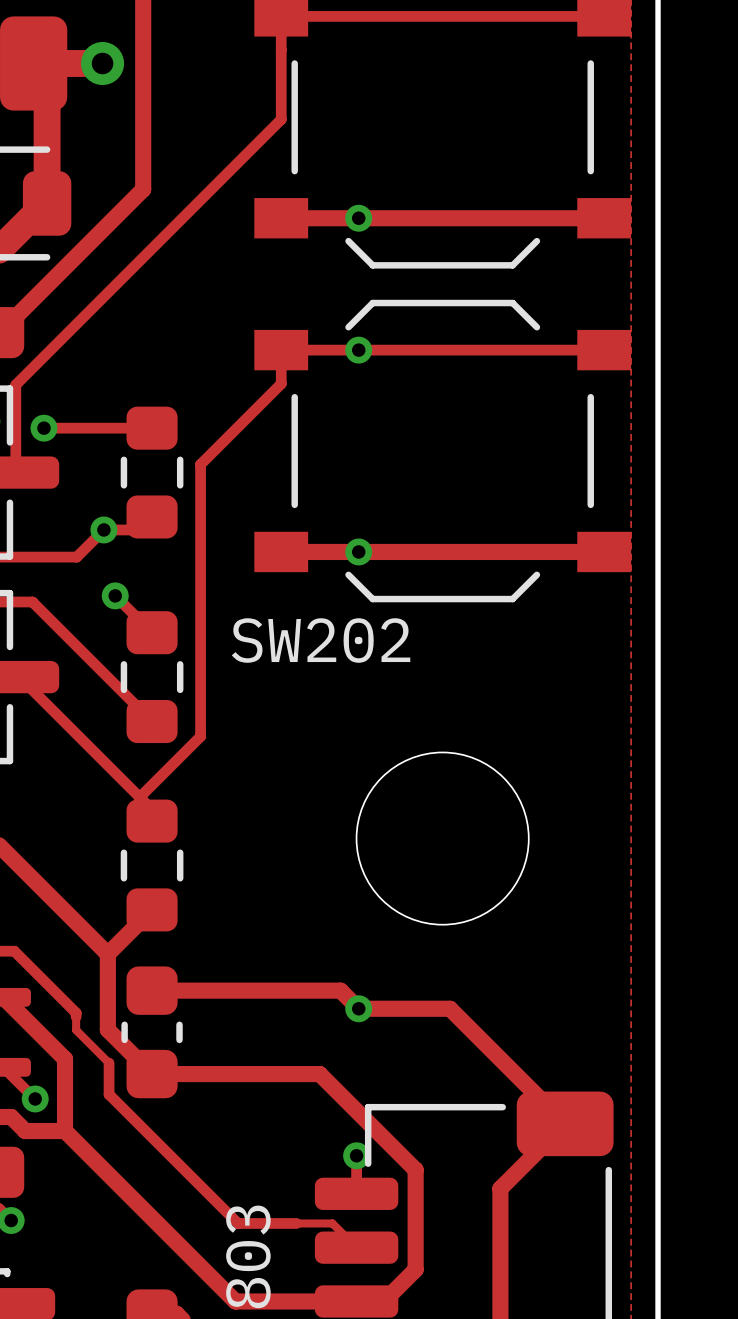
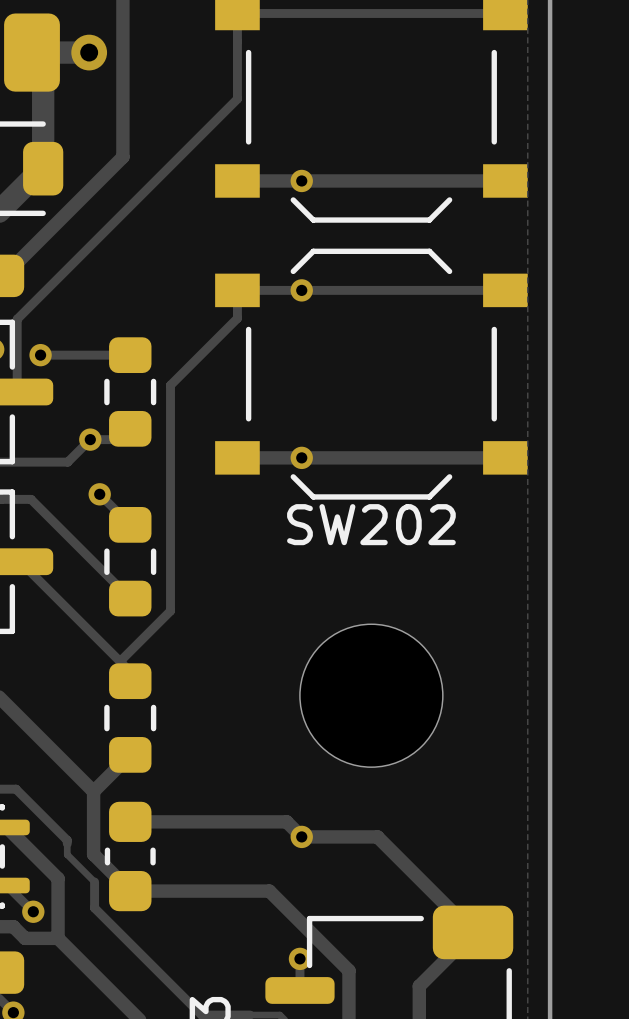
SW202 name position: SW202 (321, 640) -> SW202 (371, 524)

